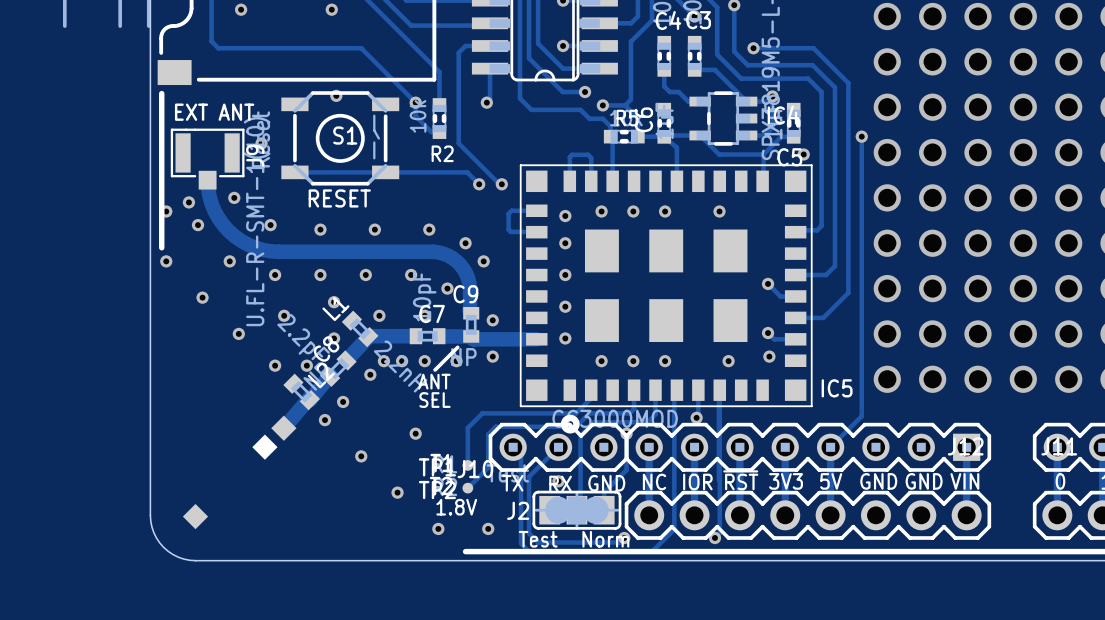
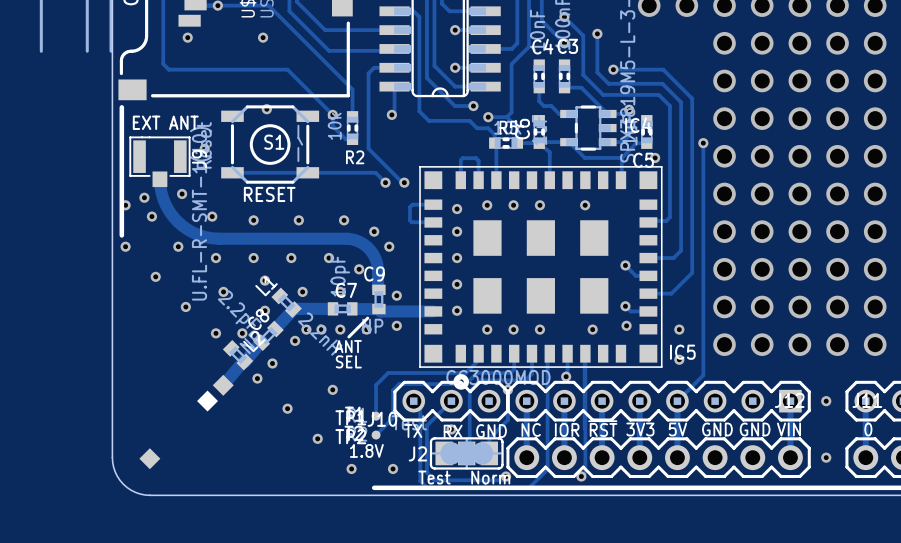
via: none -> (679, 329)
via: none -> (679, 359)
via: none -> (826, 401)
via: none -> (826, 457)

